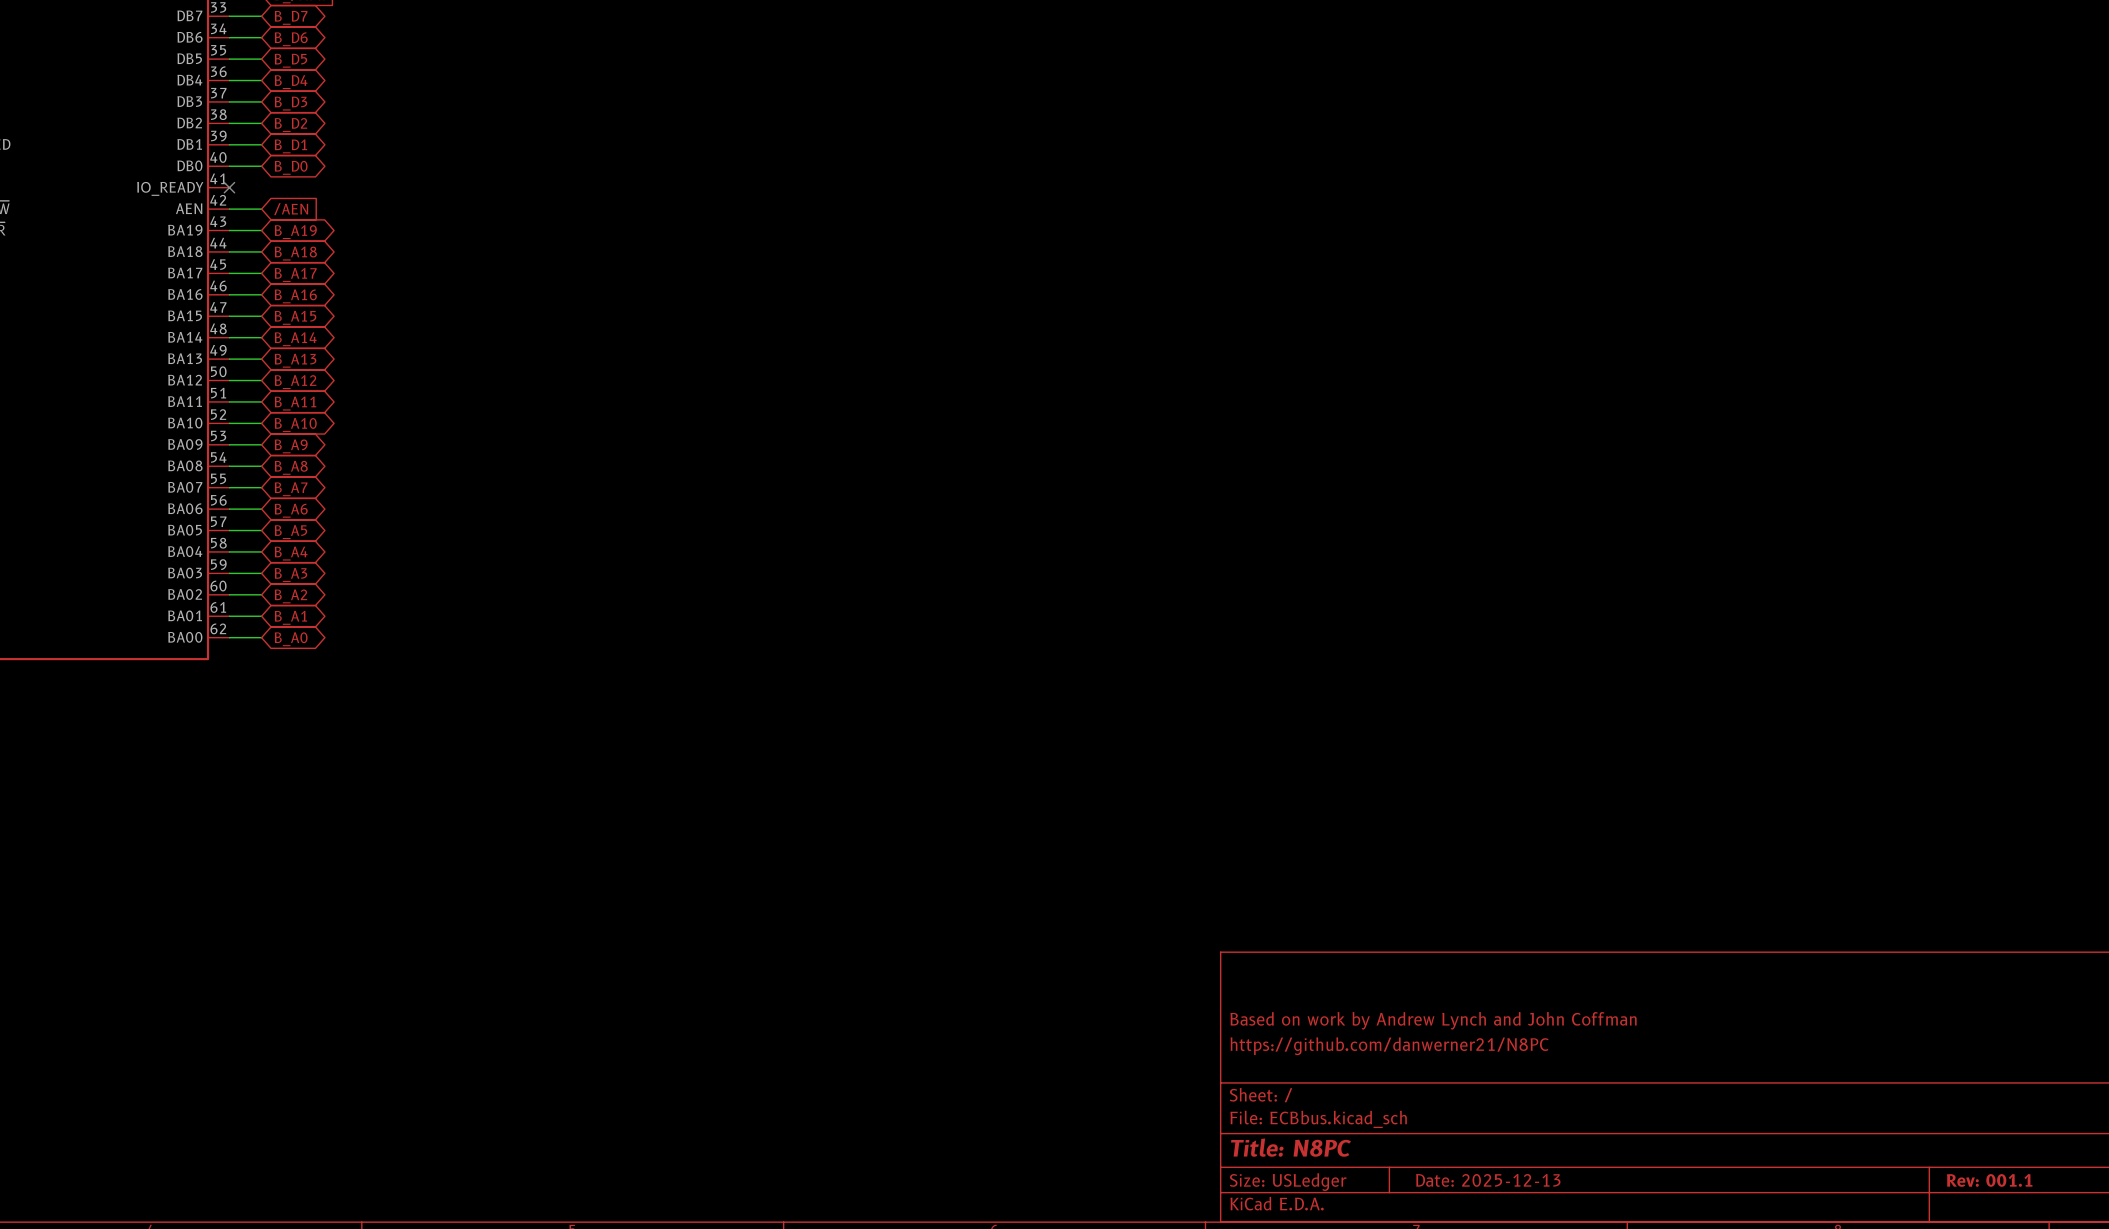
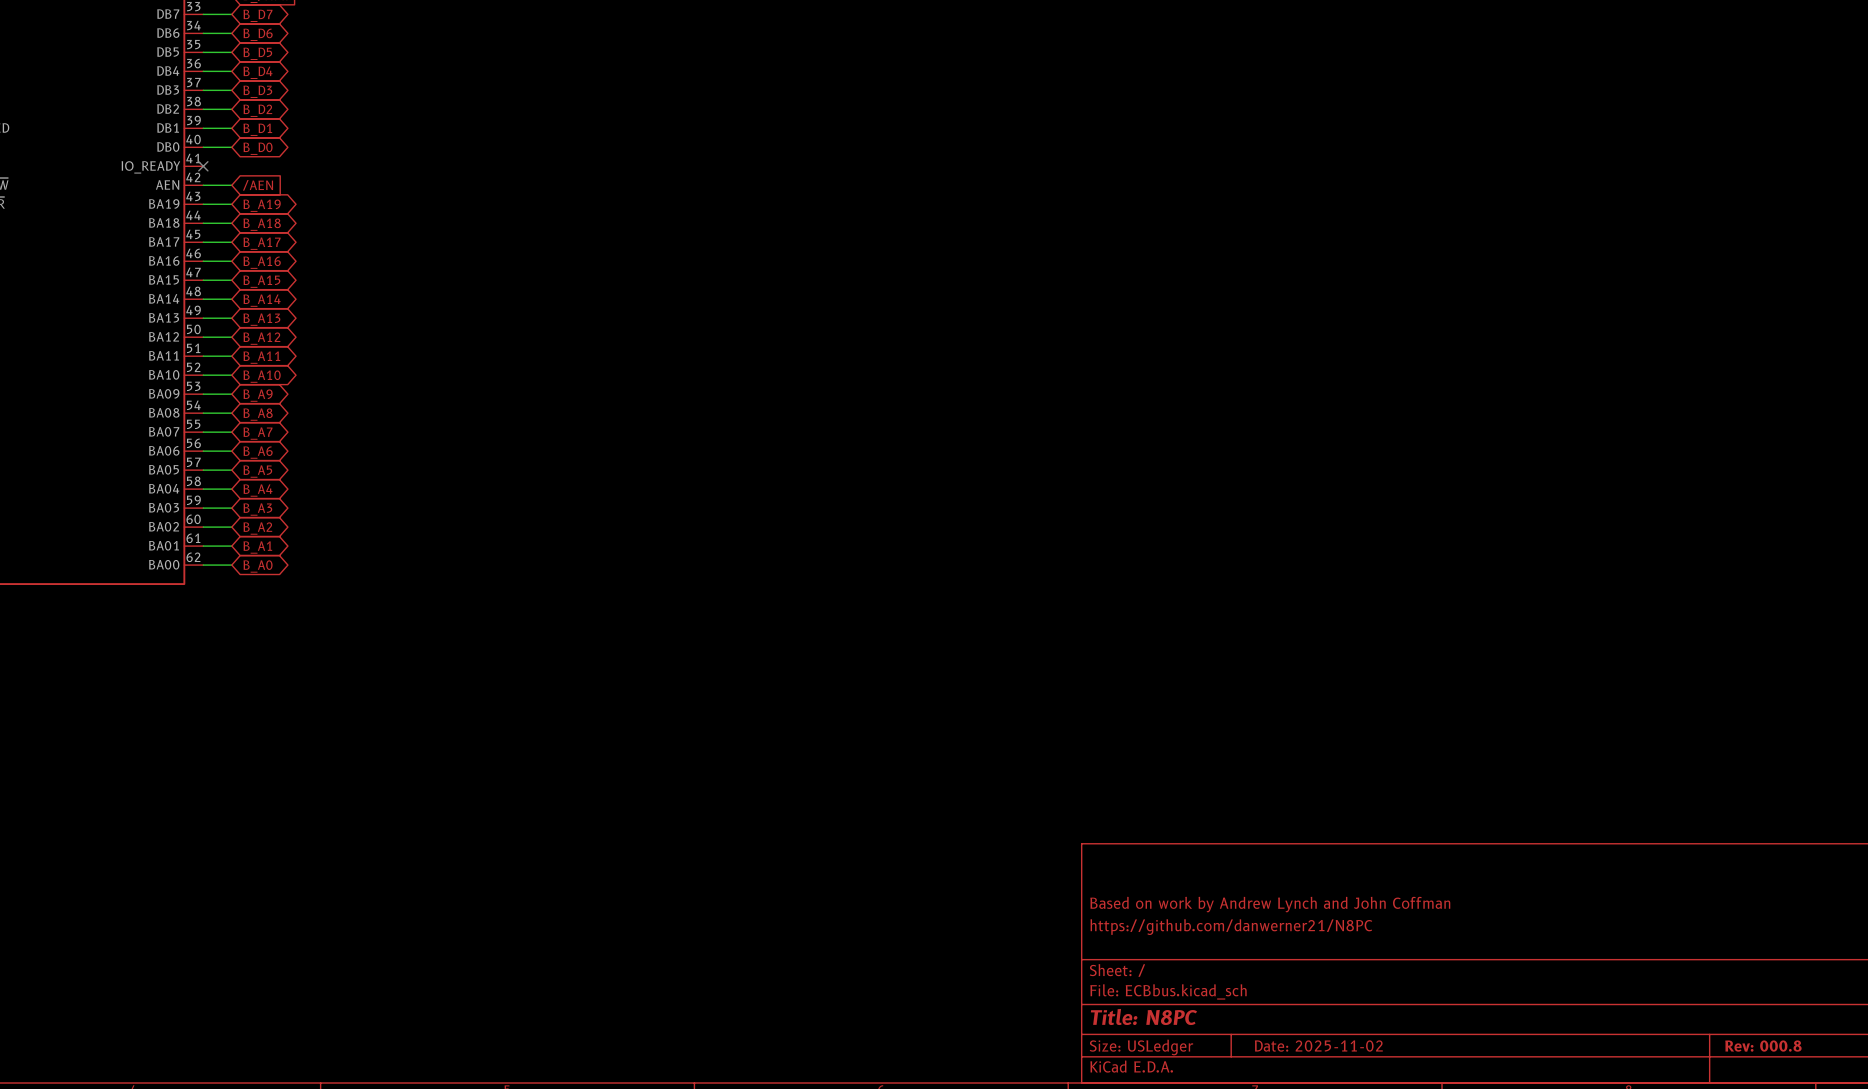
title block: Date: 2025-12-13 (1488, 1180) -> Date: 2025-11-02 (1318, 1046)
title block: Rev: 001.1 (1989, 1180) -> Rev: 000.8 (1763, 1046)

